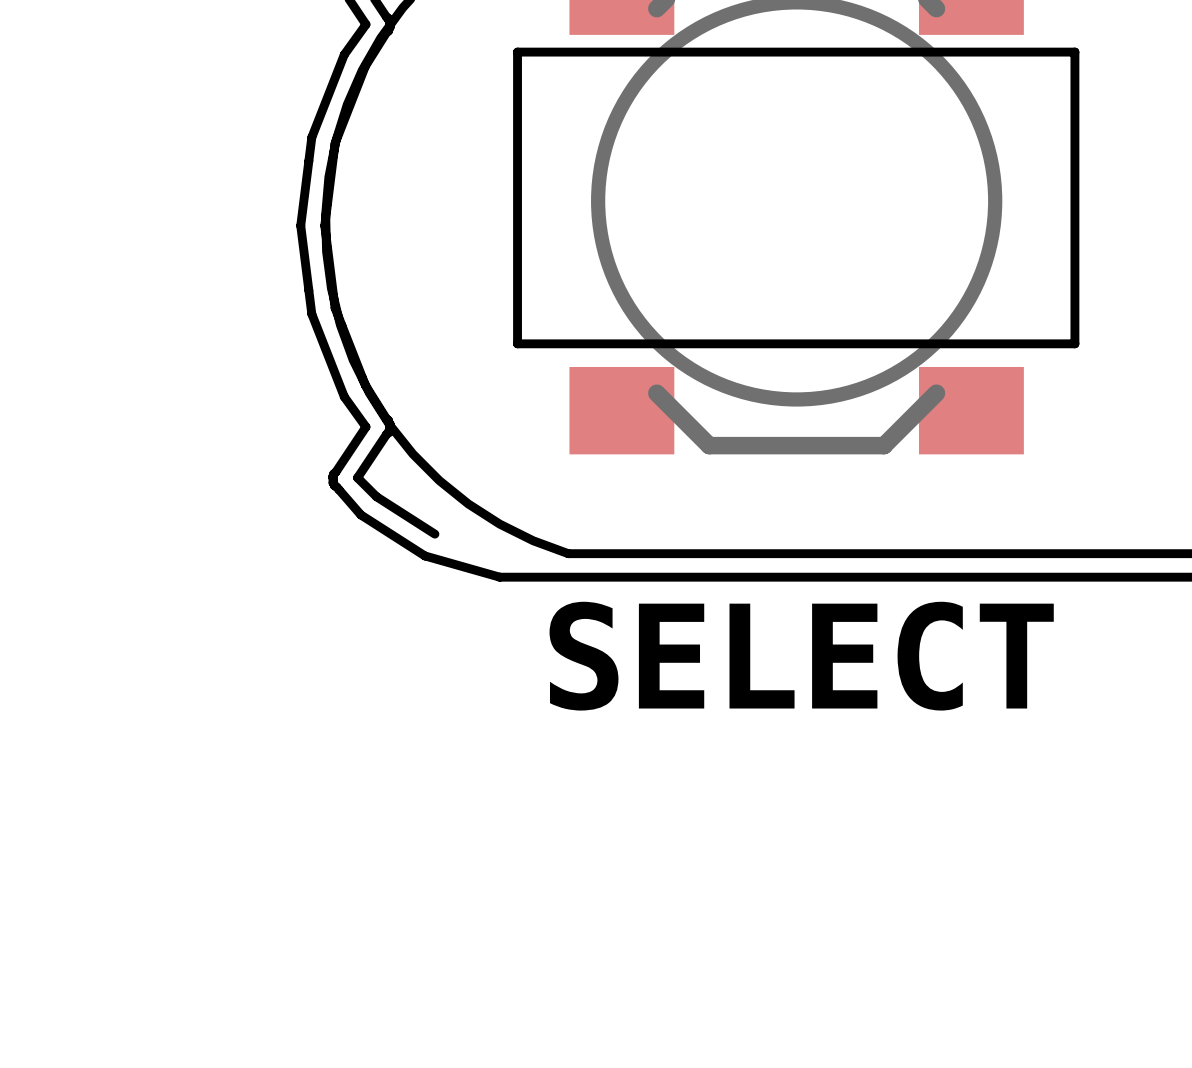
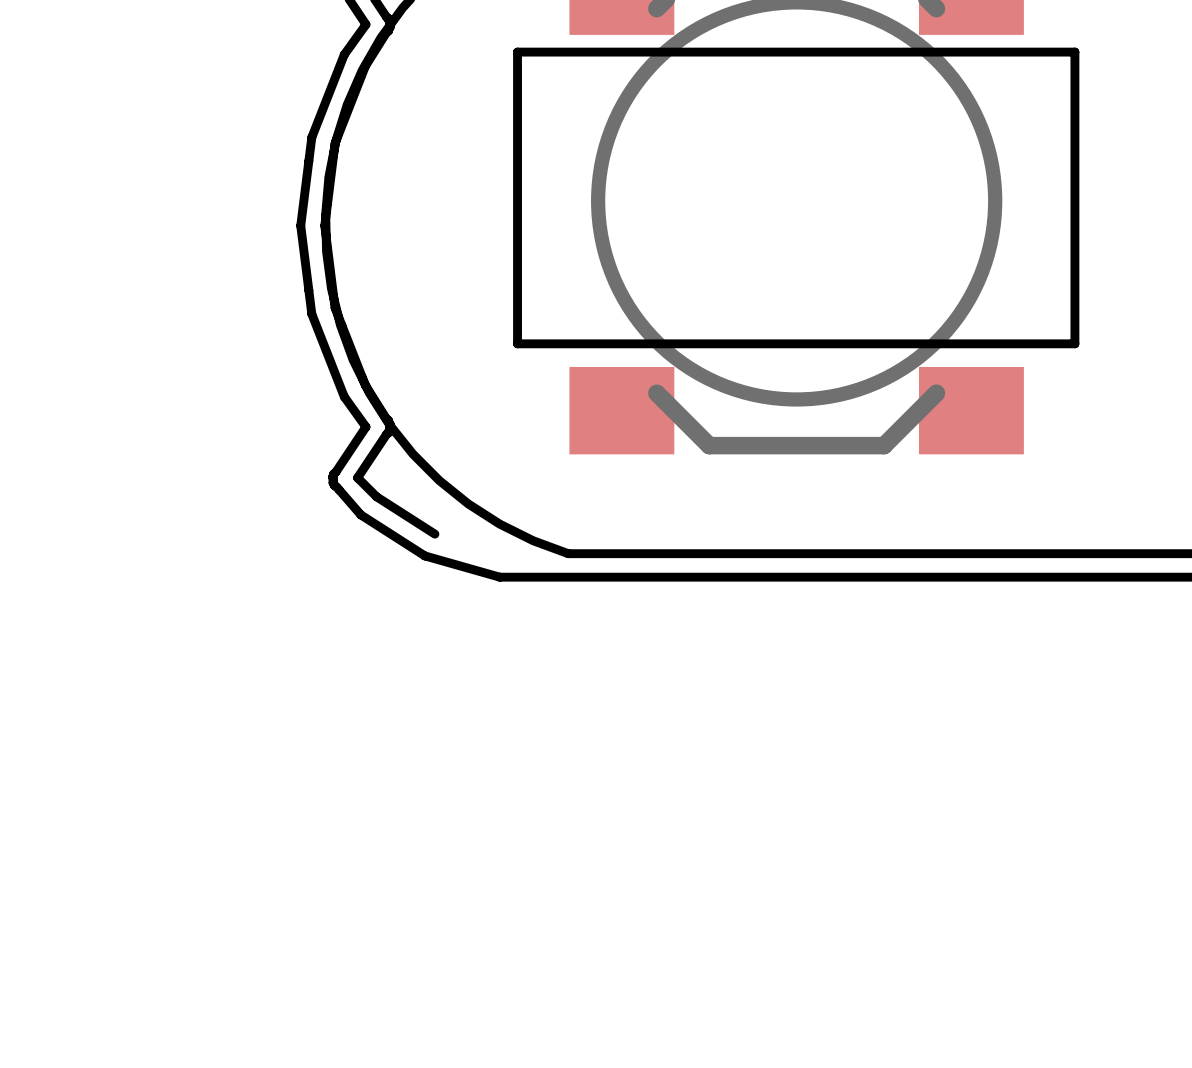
text: SELECT (801, 656) -> none

